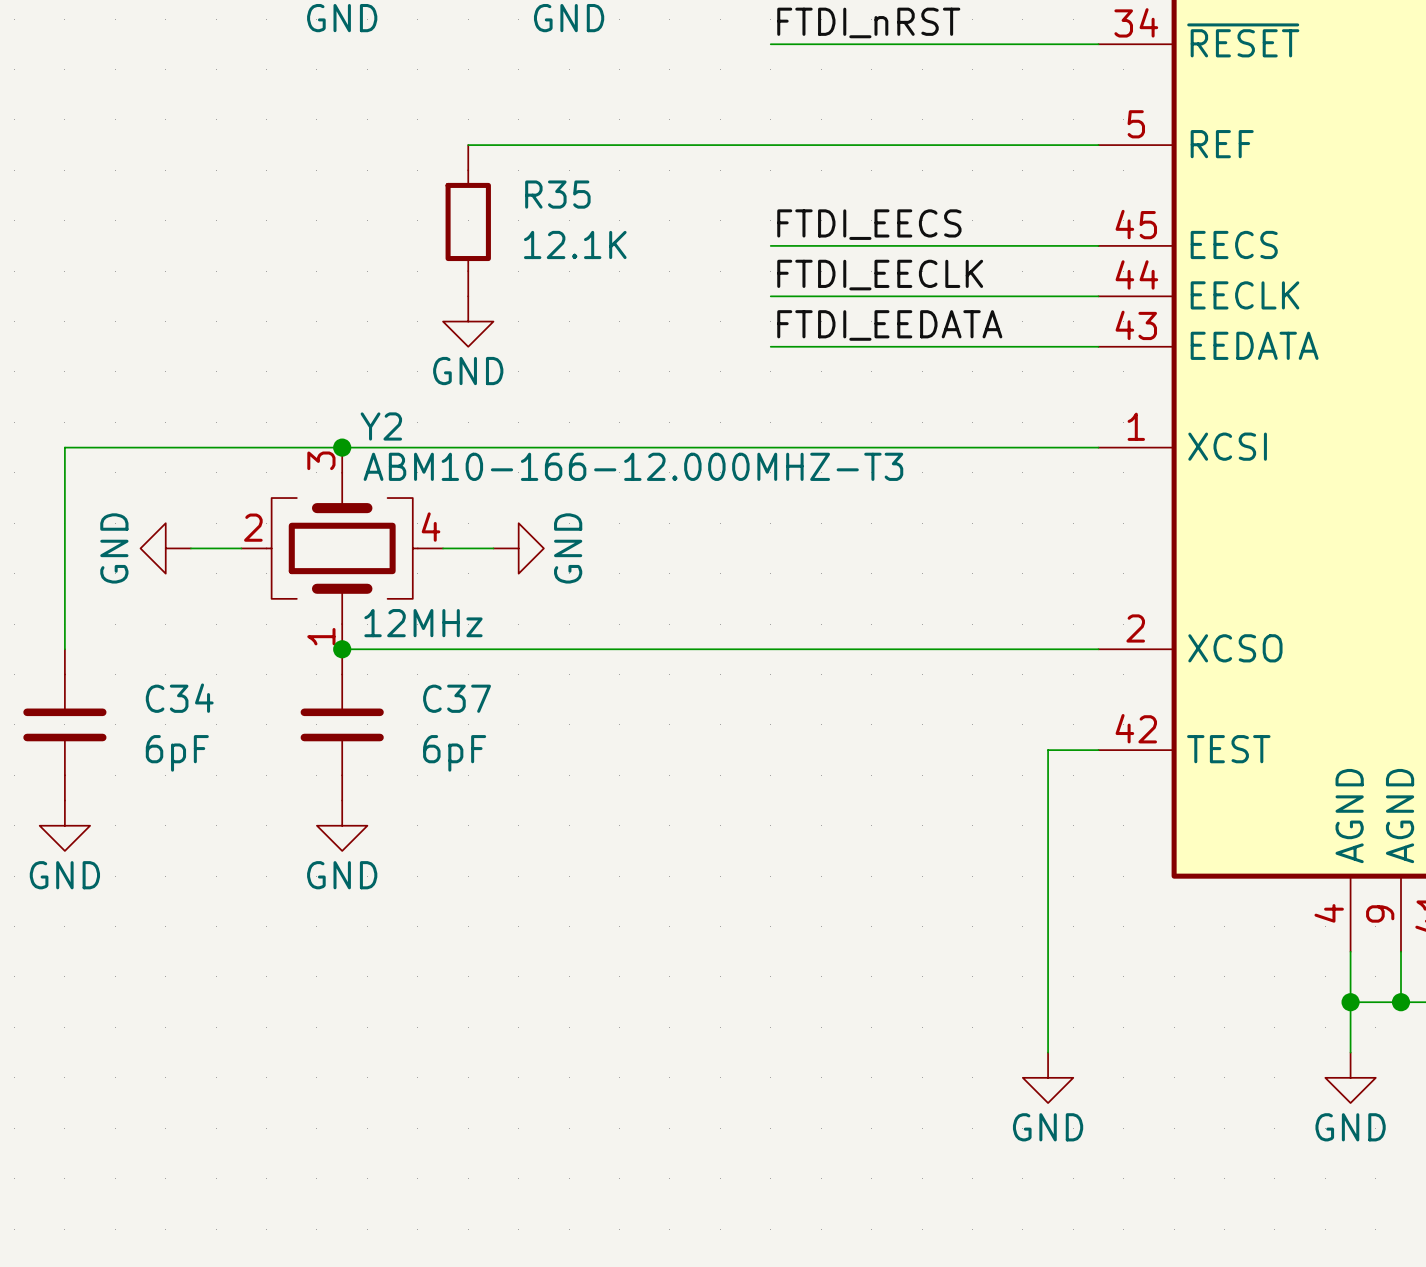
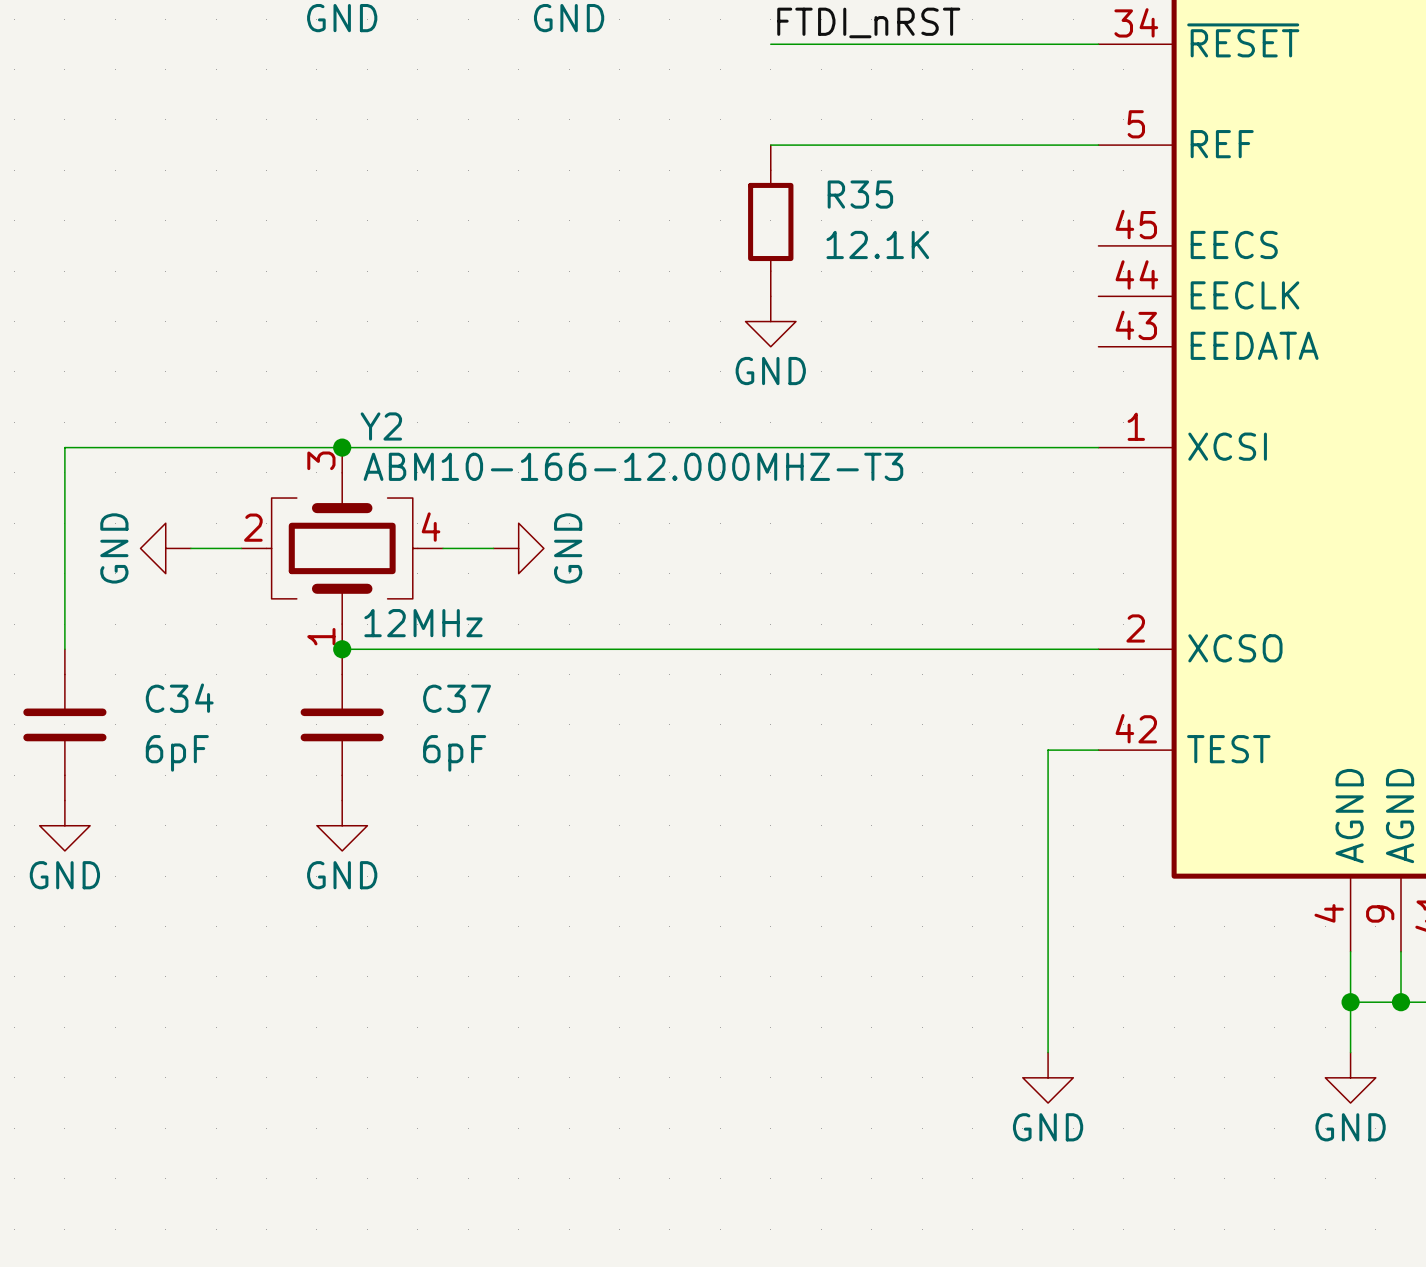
wire: (468, 145) (770, 145) -> none
R35 position: (468, 220) -> (770, 220)
label: FTDI_EECS (869, 224) -> none
wire: (770, 245) (1098, 245) -> none
label: FTDI_EECLK (880, 275) -> none
wire: (770, 296) (1098, 296) -> none
power symbol position: GND (468, 321) -> GND (770, 321)
label: FTDI_EEDATA (889, 325) -> none
wire: (770, 346) (1098, 346) -> none

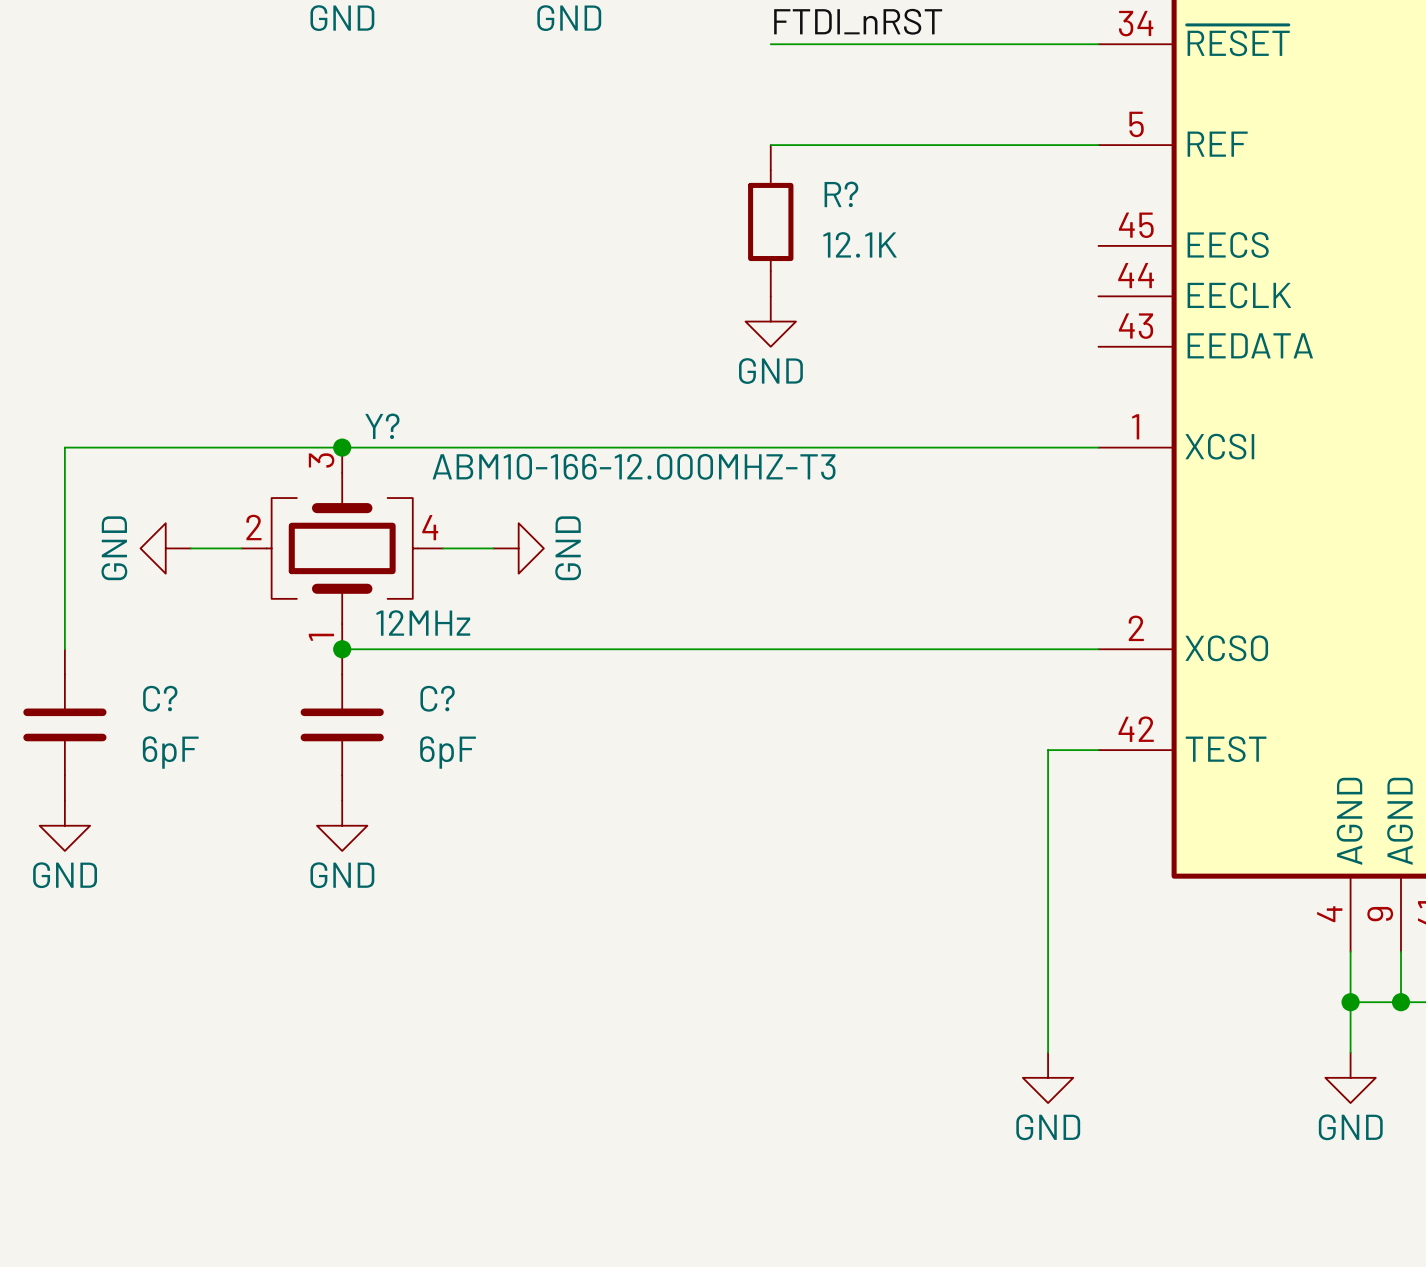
R35 name: R35 (860, 194) -> R? (841, 194)
Y2 name: Y2 (381, 426) -> Y? (382, 426)
C34 name: C34 (179, 698) -> C? (160, 698)
C37 name: C37 (457, 698) -> C? (437, 698)

